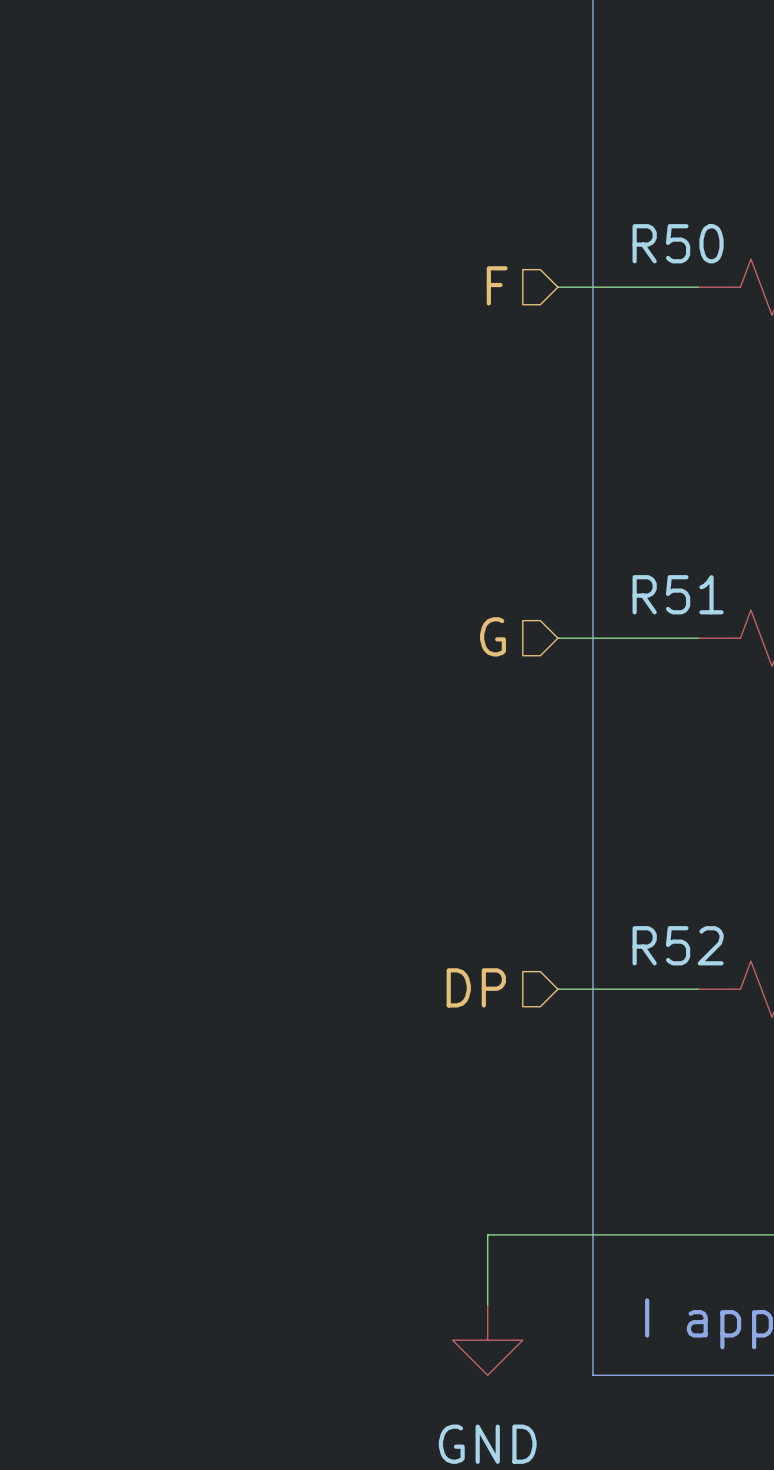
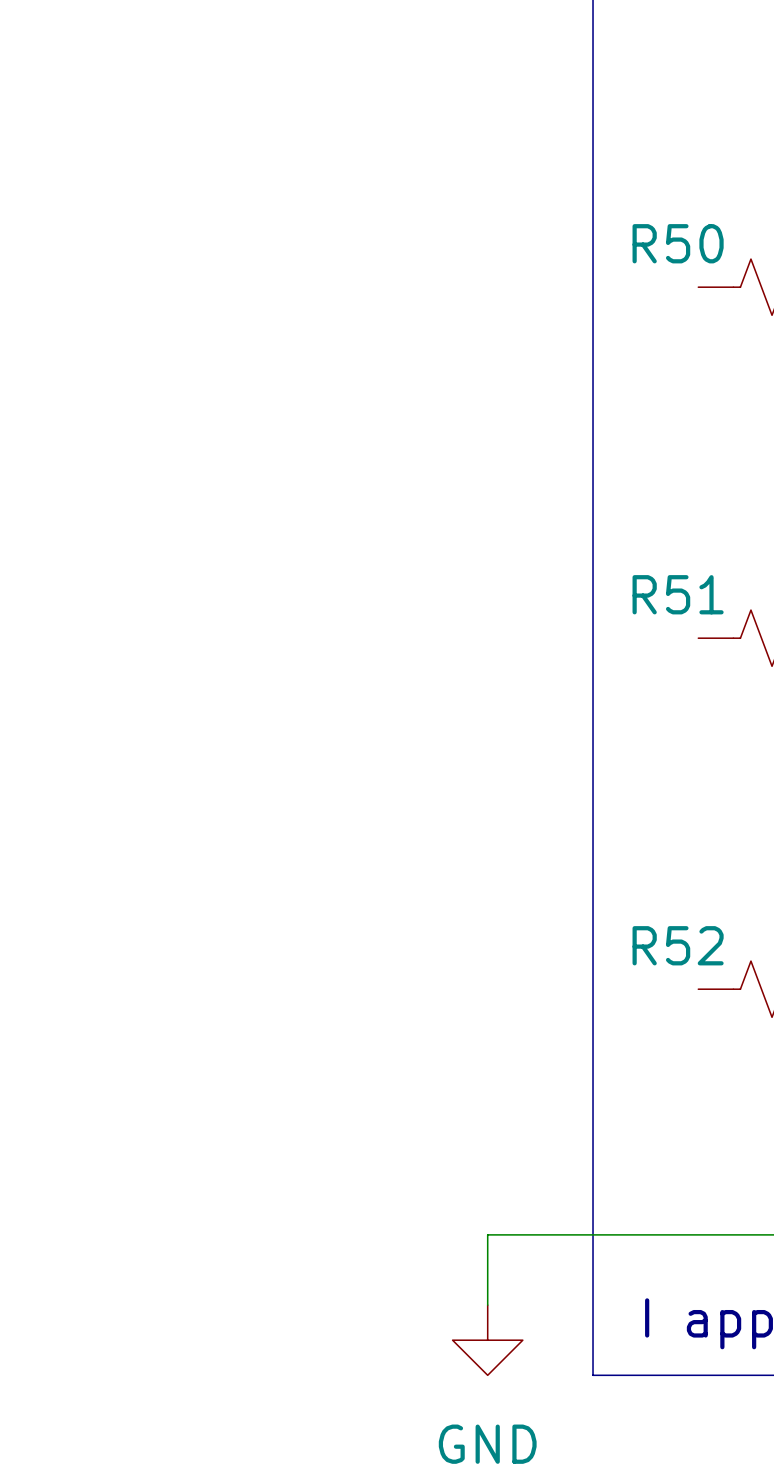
hierarchical label: F (497, 285) -> none
wire: (557, 287) (698, 287) -> none
hierarchical label: G (493, 636) -> none
wire: (557, 638) (698, 638) -> none
hierarchical label: DP (476, 987) -> none
wire: (557, 989) (698, 989) -> none

